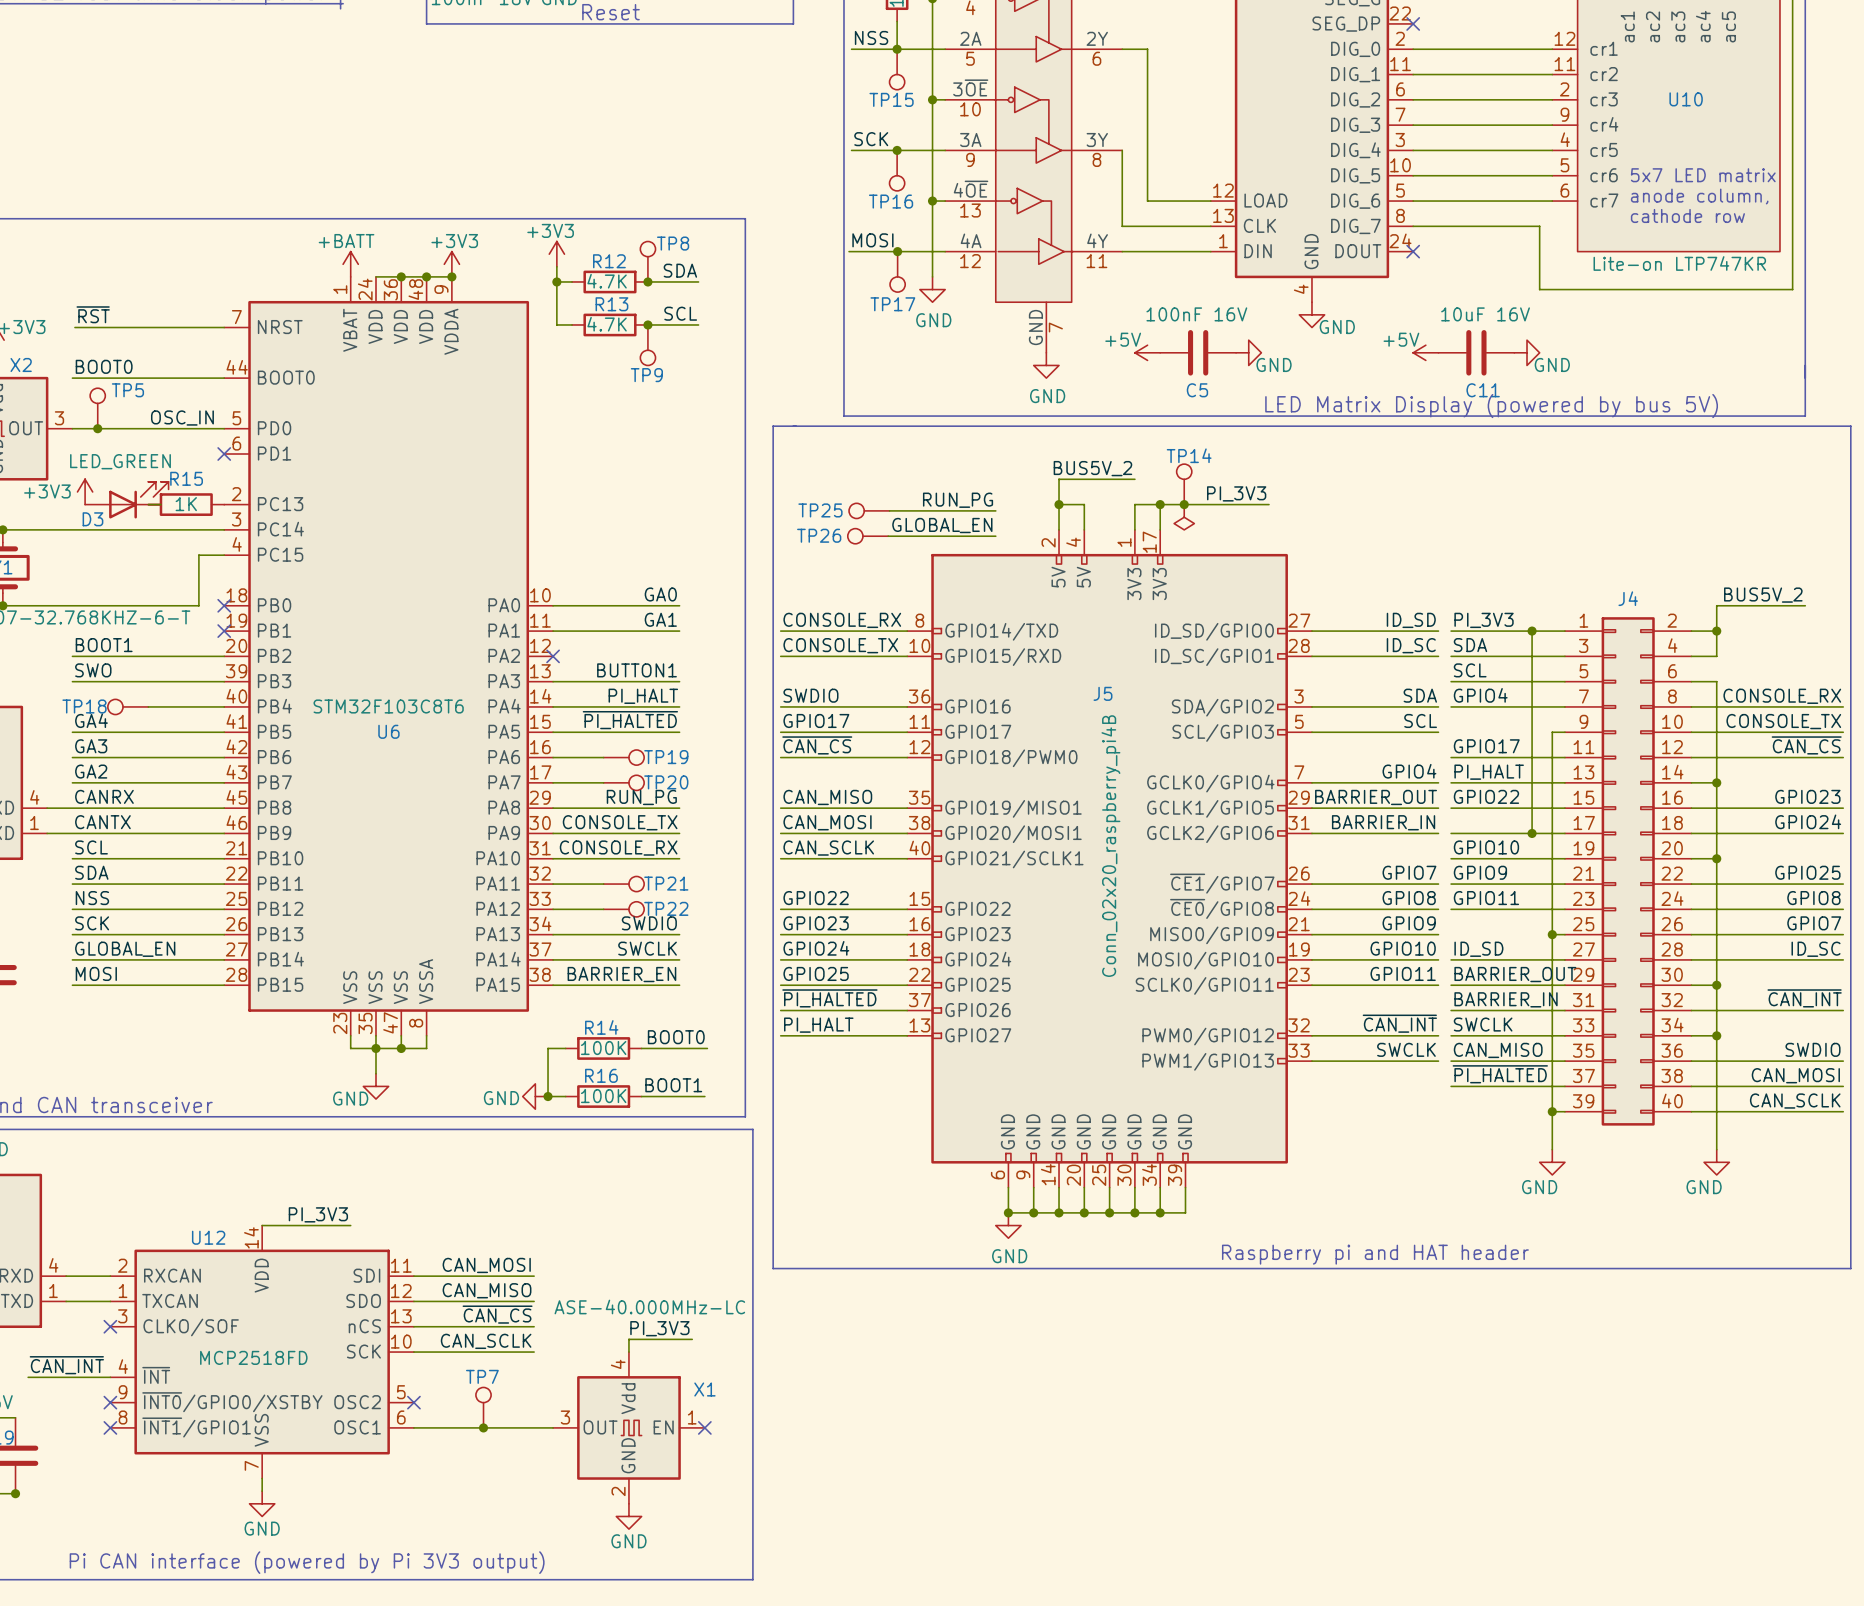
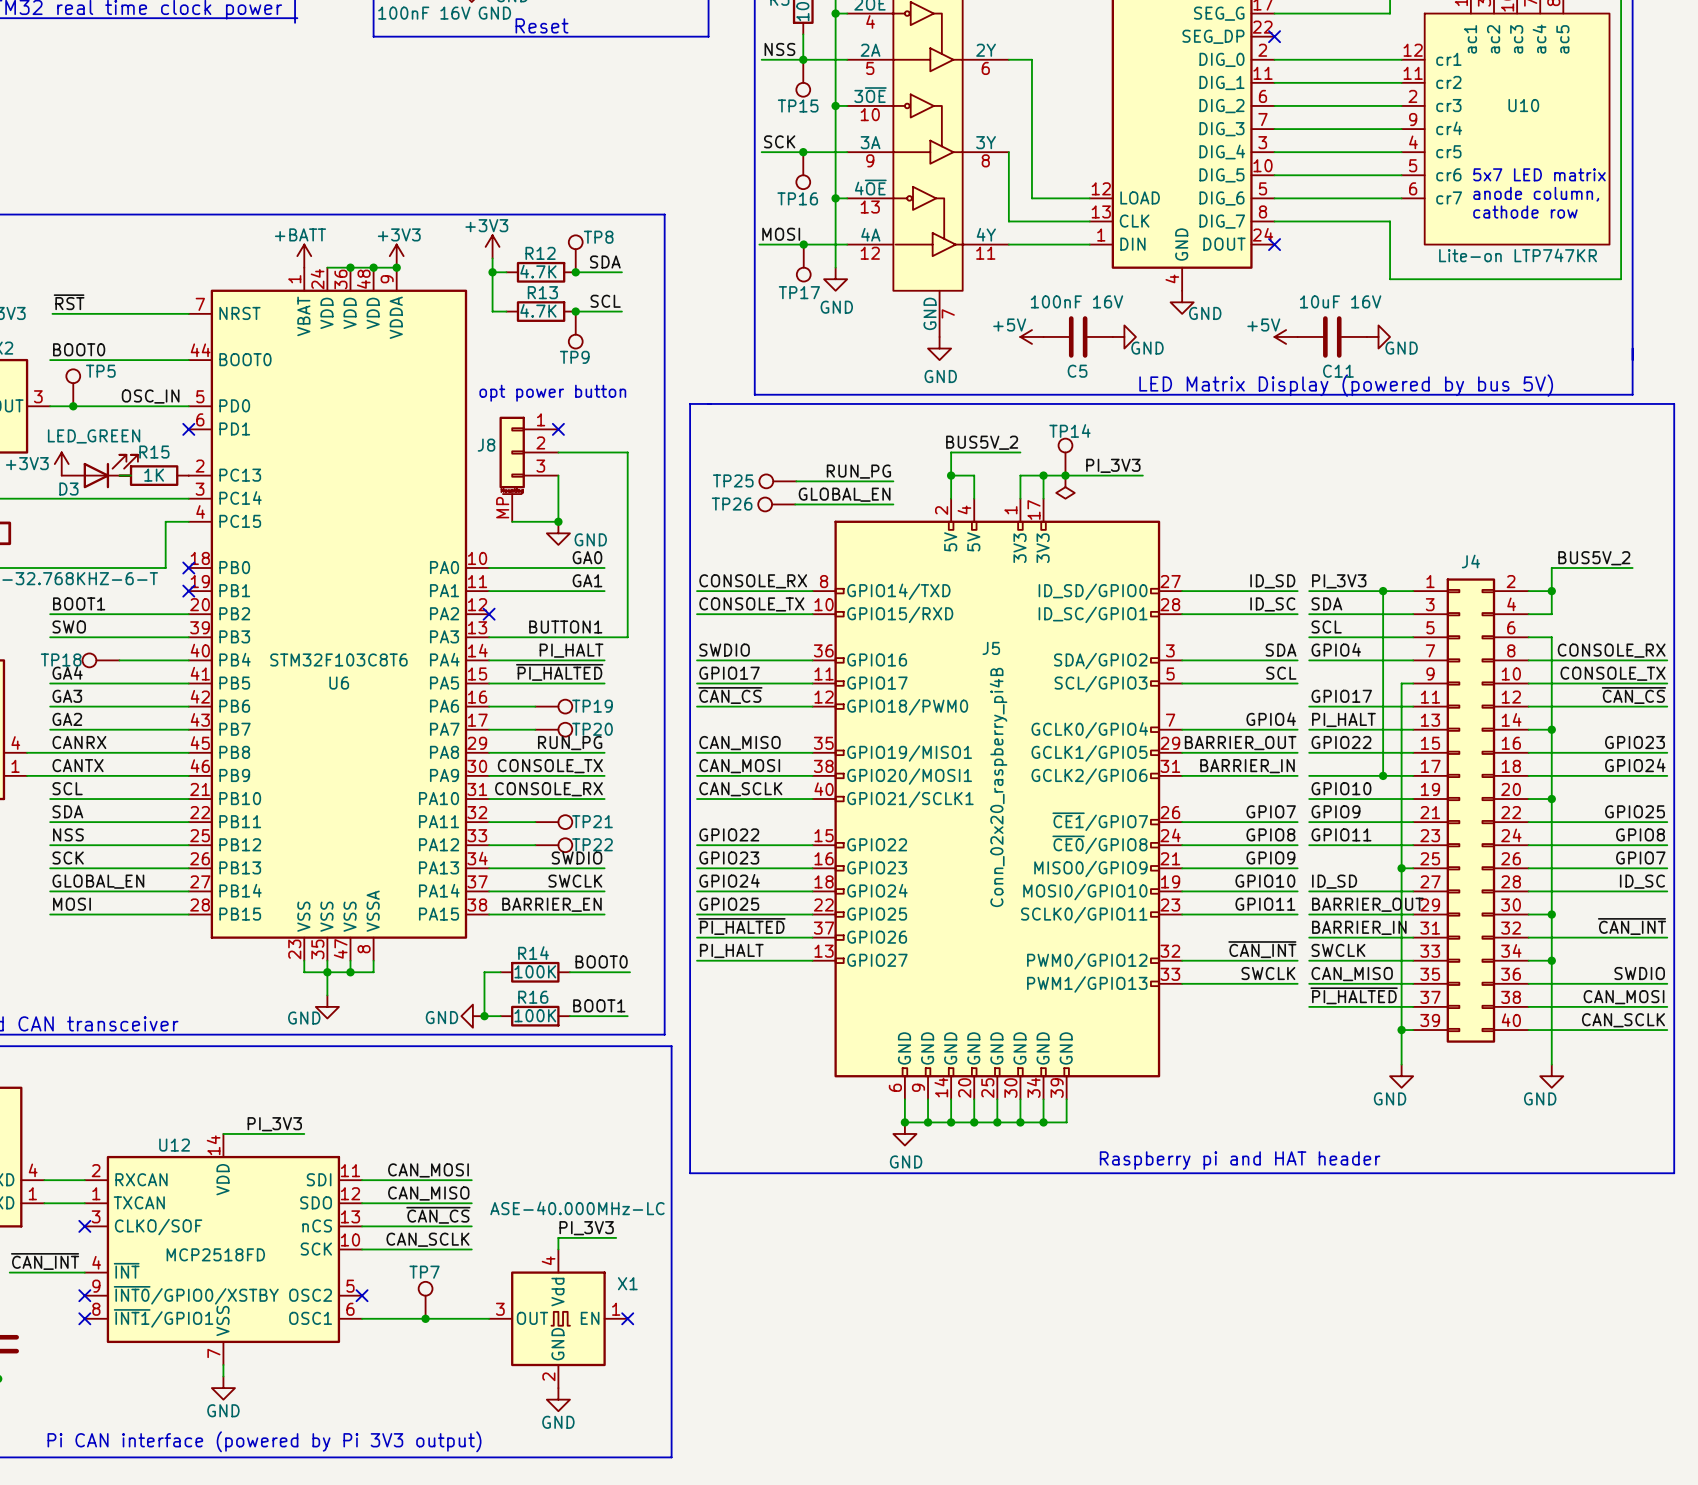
text: none -> opt power button (552, 393)
no-connect mark: none -> (558, 429)
wire: none -> (558, 452) (627, 452) (627, 637) (604, 637)
J8: none -> (528, 469)
wire: none -> (558, 475) (558, 521) (512, 521)
junction: none -> (558, 521)
power symbol: none -> GND (558, 533)

